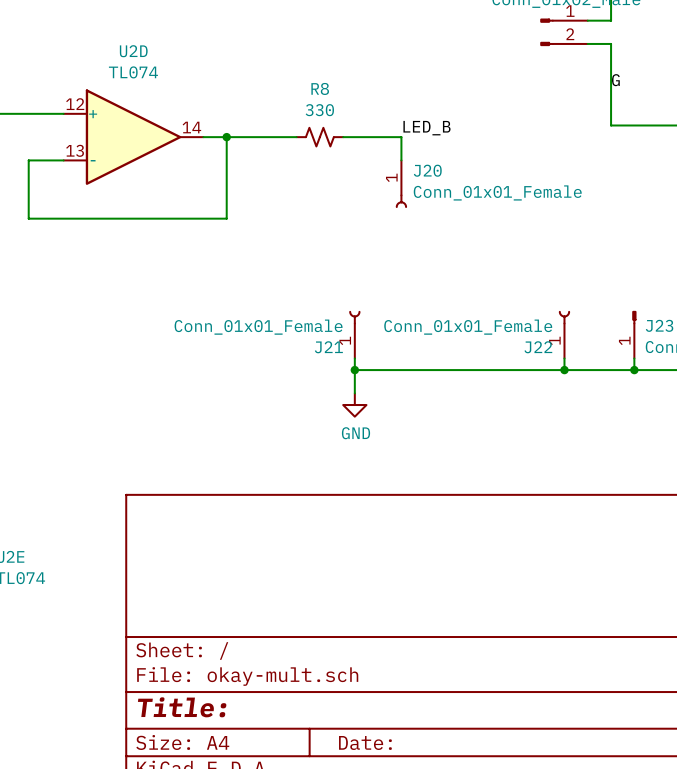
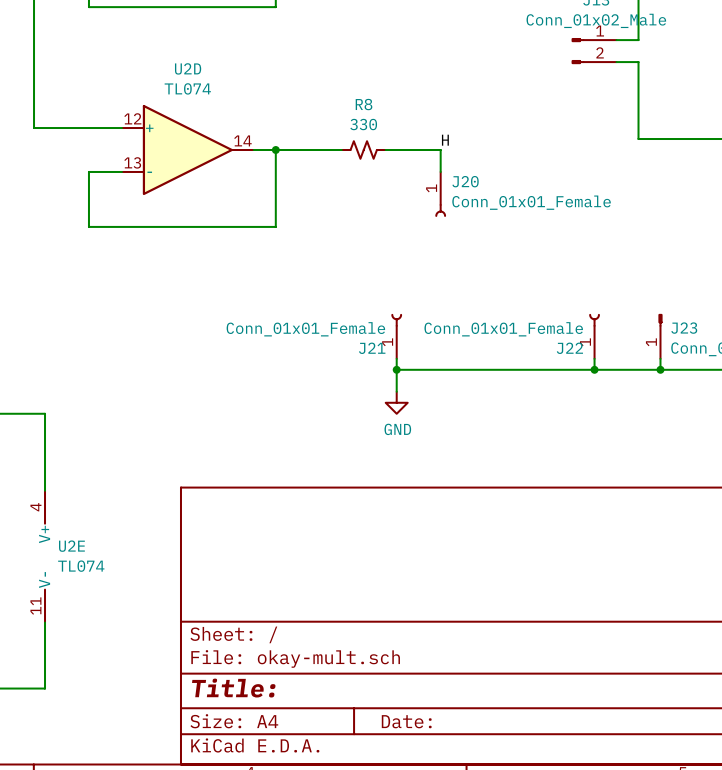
label: G (615, 80) -> none
label: LED_B (426, 128) -> H (445, 140)

